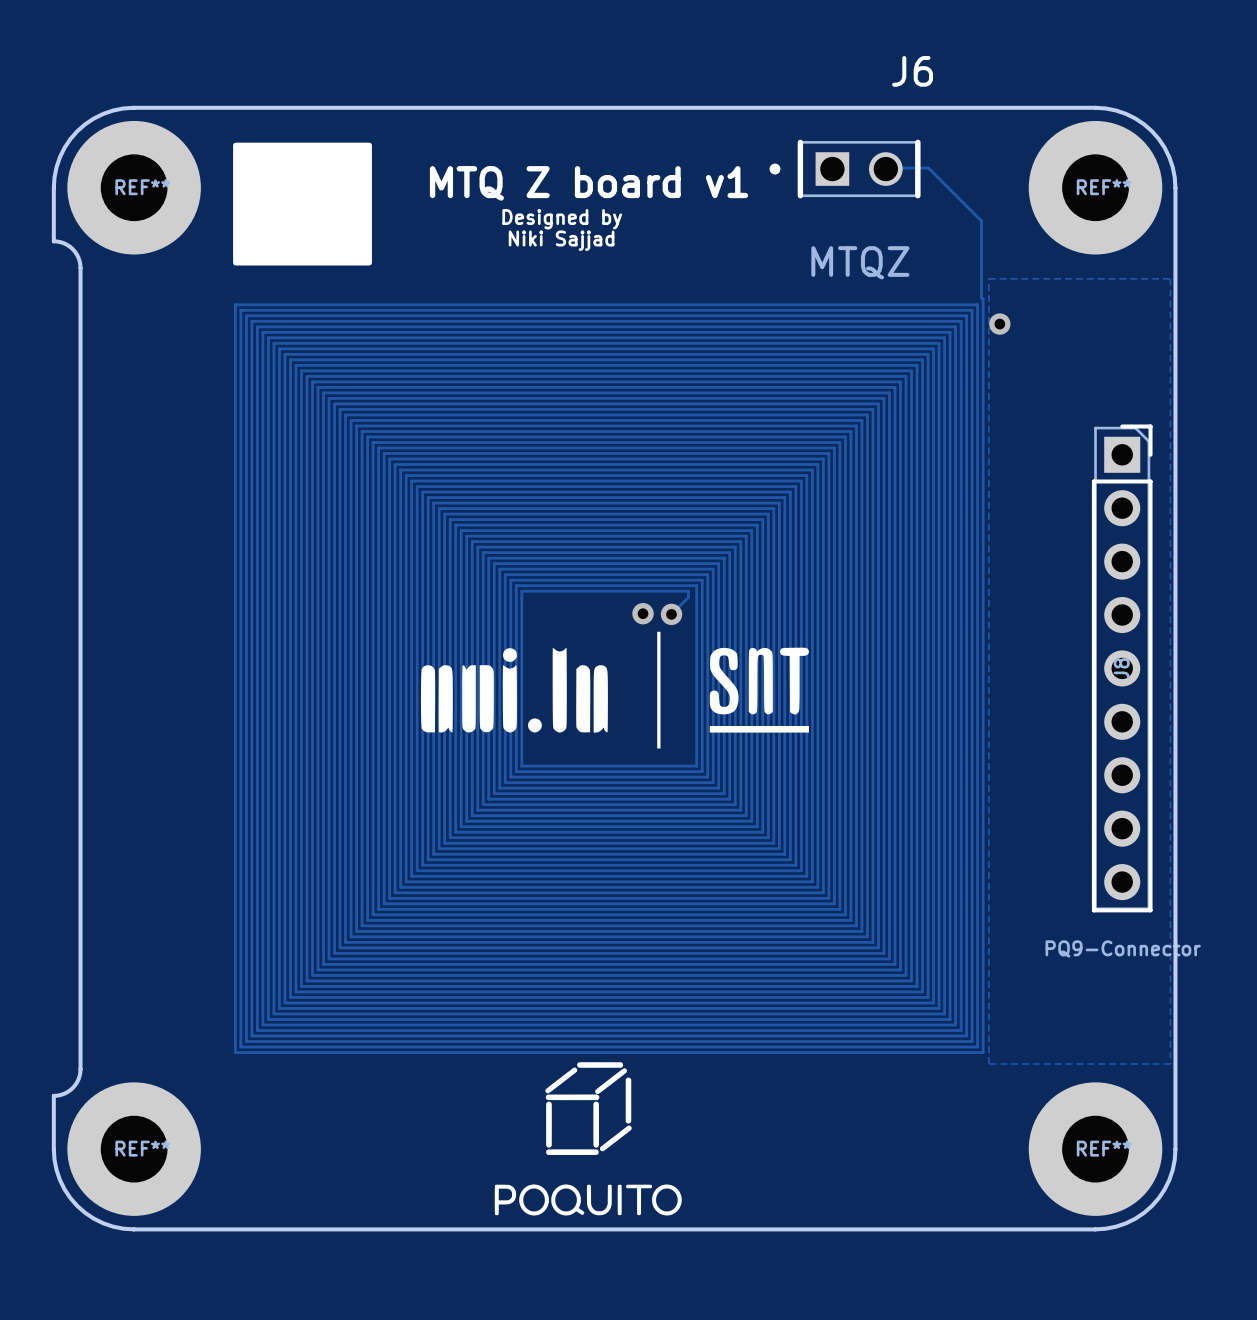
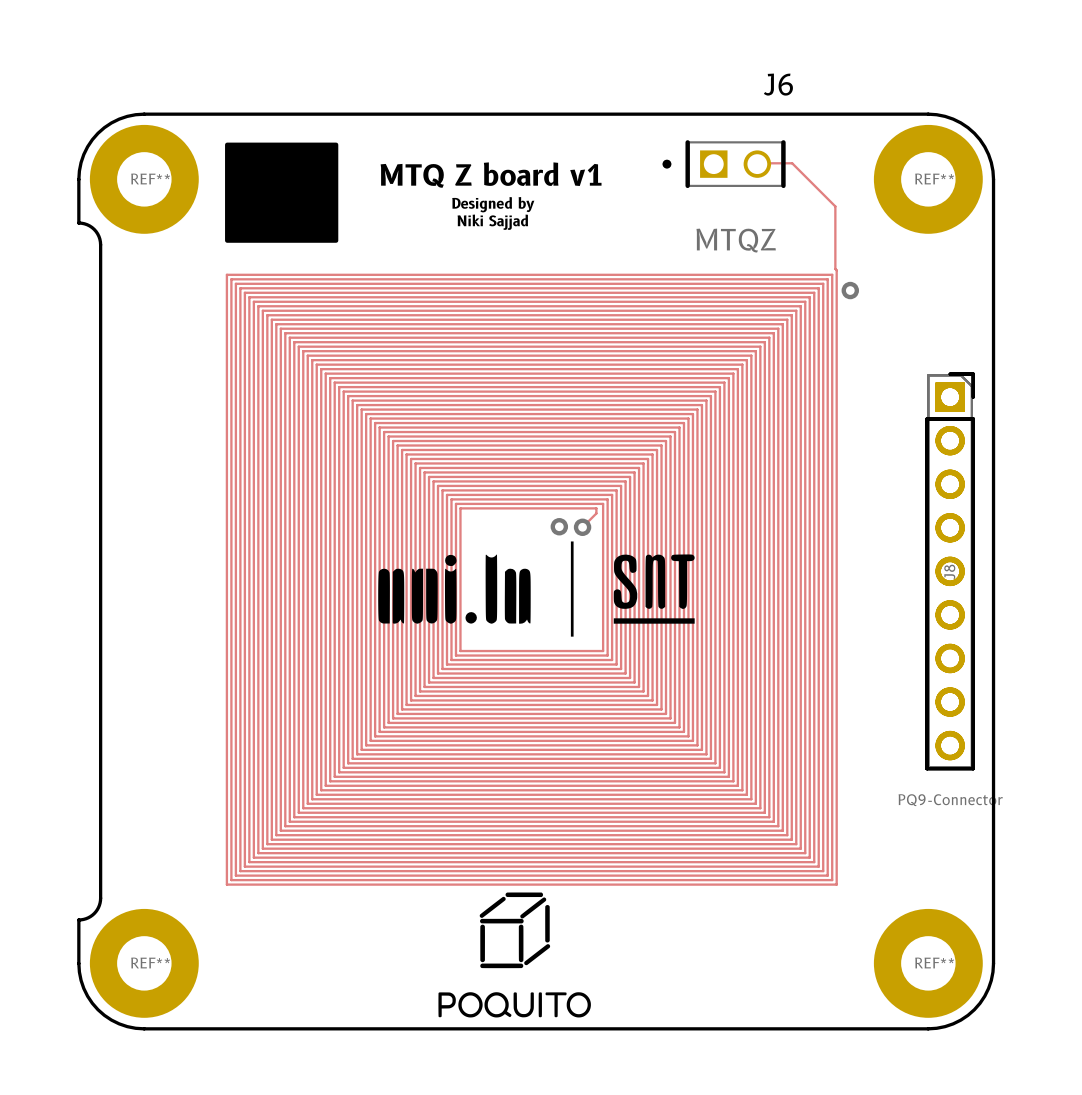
zone outline: (988, 278) (988, 1063) (1170, 1063) (1170, 278) (988, 278) -> none
part: none -> (950, 571)

